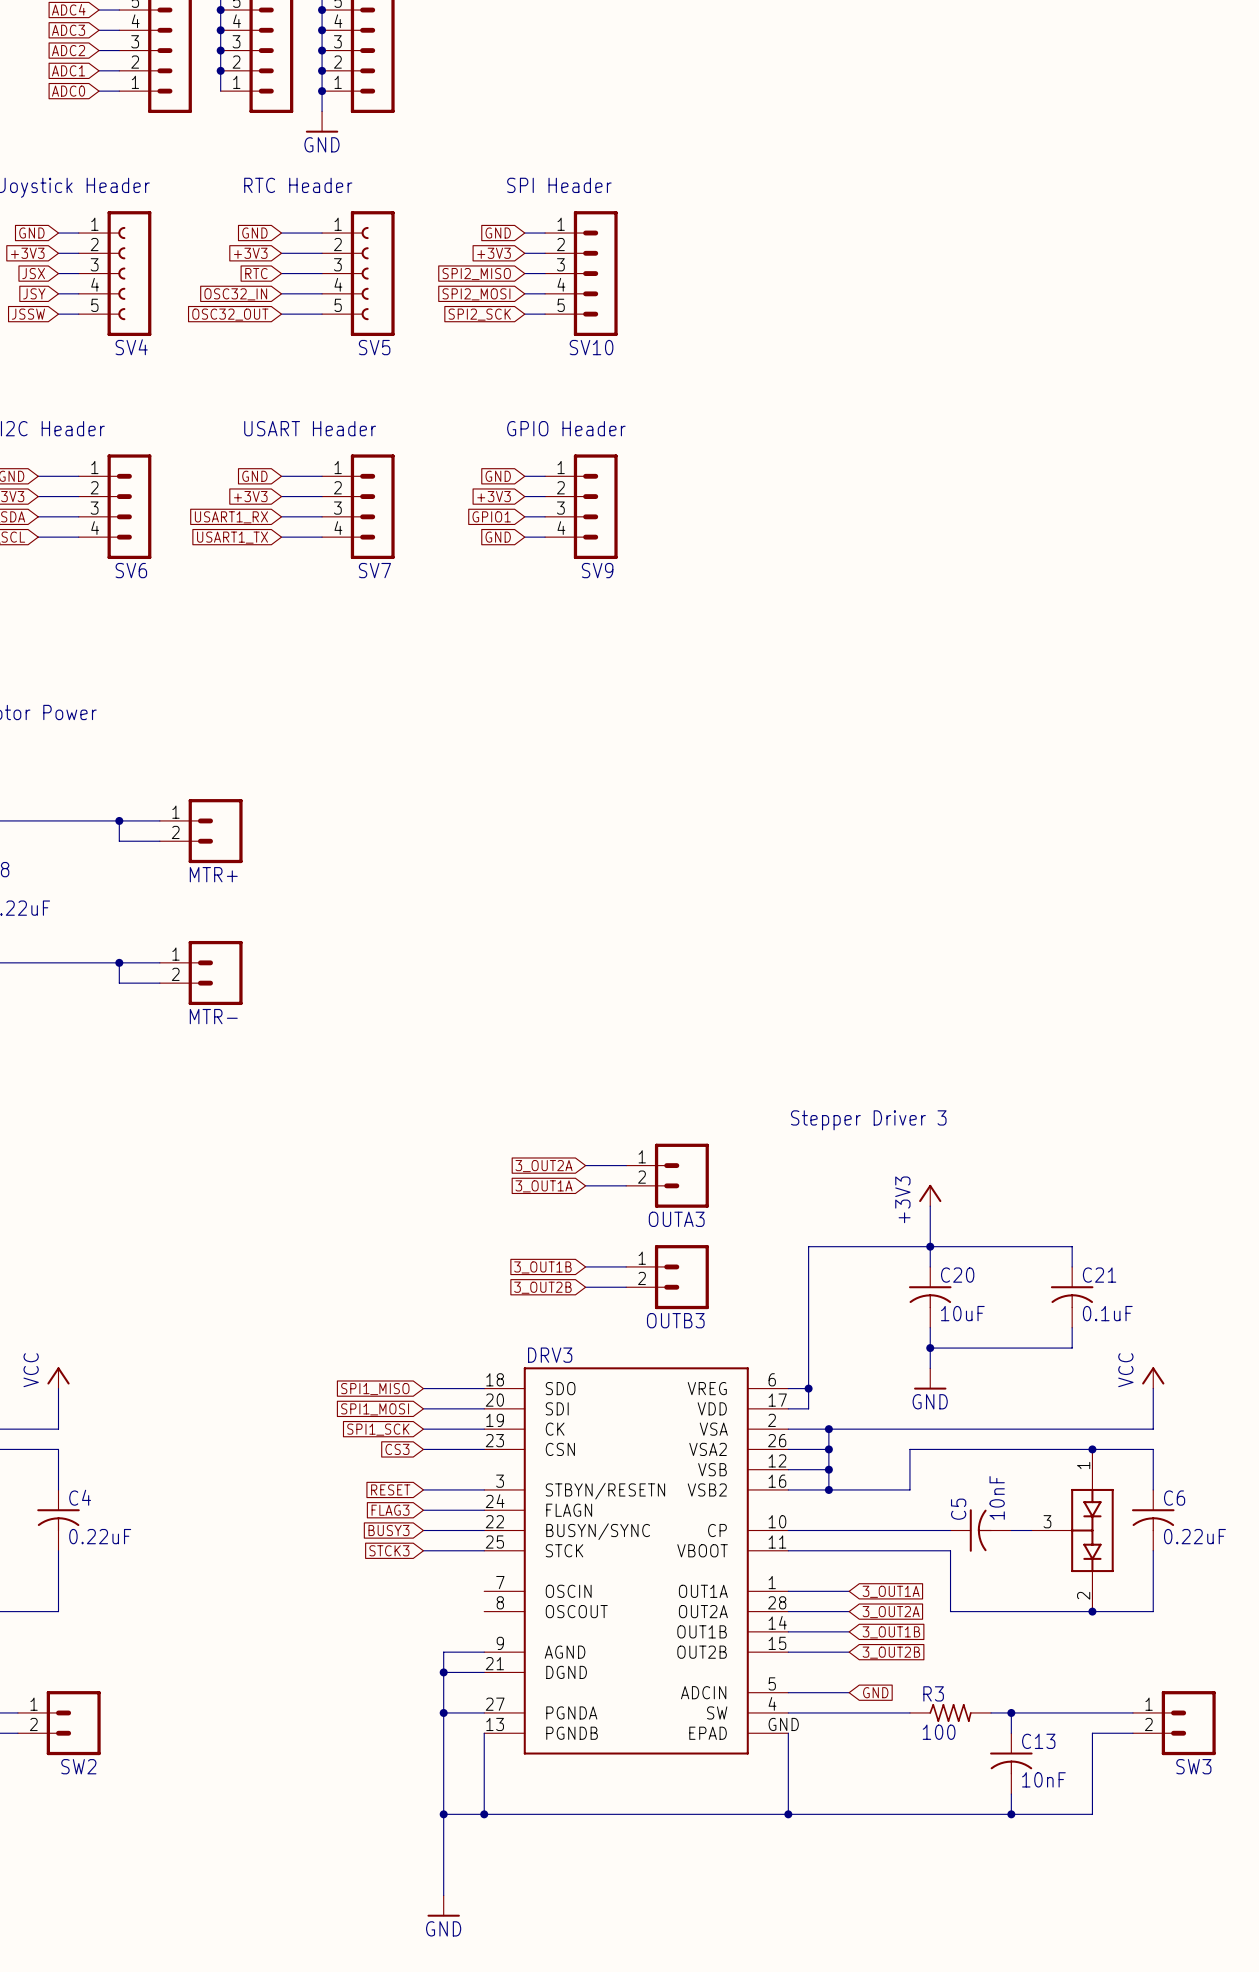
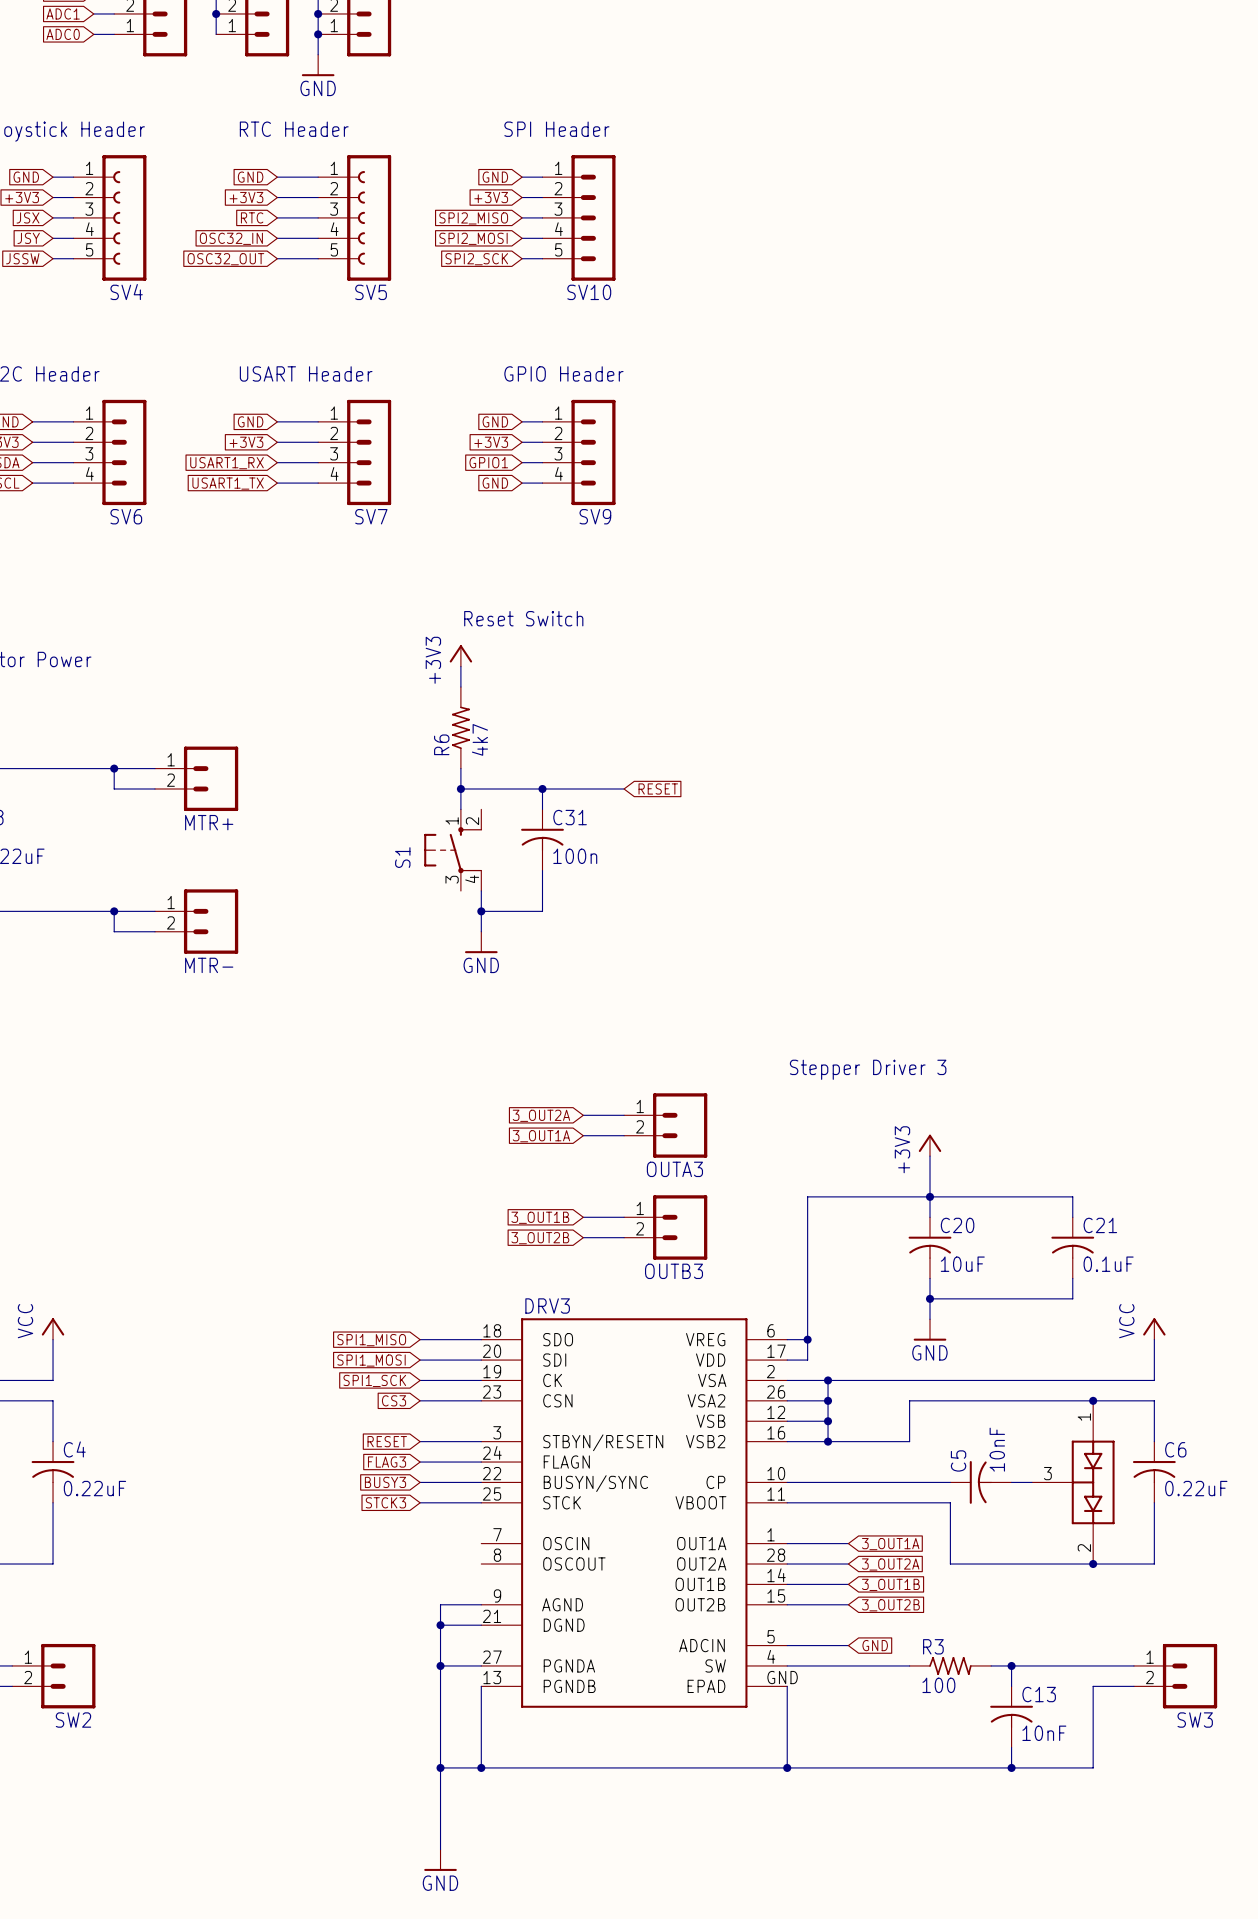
text: none -> Reset Switch (523, 618)
power symbol: none -> +3V3 (460, 655)
wire: none -> (460, 666) (460, 687)
R6: none -> 4k7 (460, 727)
wire: none -> (460, 768) (460, 809)
wire: none -> (460, 788) (624, 788)
junction: none -> (460, 788)
wire: none -> (542, 788) (542, 809)
junction: none -> (542, 788)
global label: none -> RESET (658, 788)
C31: none -> 100n (542, 839)
S1: none -> (453, 850)
wire: none -> (542, 870) (542, 911) (481, 911)
wire: none -> (481, 890) (481, 931)
junction: none -> (481, 911)
power symbol: none -> GND (481, 942)

